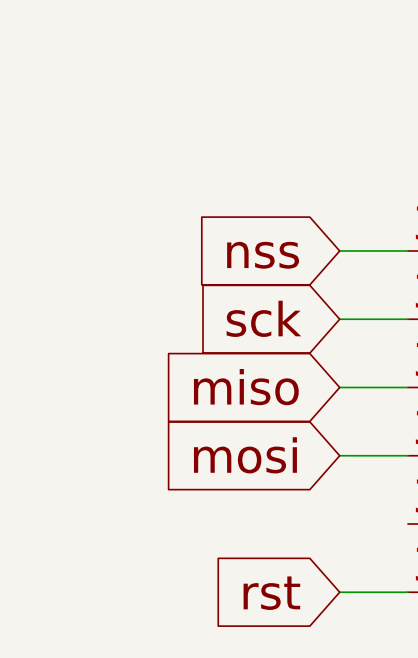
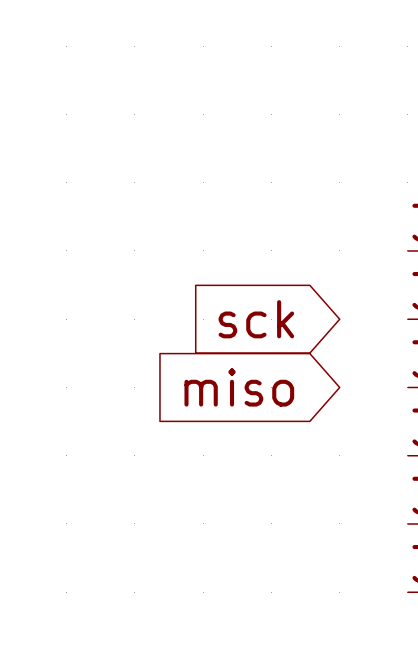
wire: (339, 250) (407, 250) -> none
global label: nss (263, 255) -> none
wire: (339, 319) (407, 319) -> none
wire: (339, 387) (407, 387) -> none
global label: mosi (245, 455) -> none
wire: (339, 455) (407, 455) -> none
wire: (339, 592) (407, 592) -> none
global label: rst (271, 593) -> none

